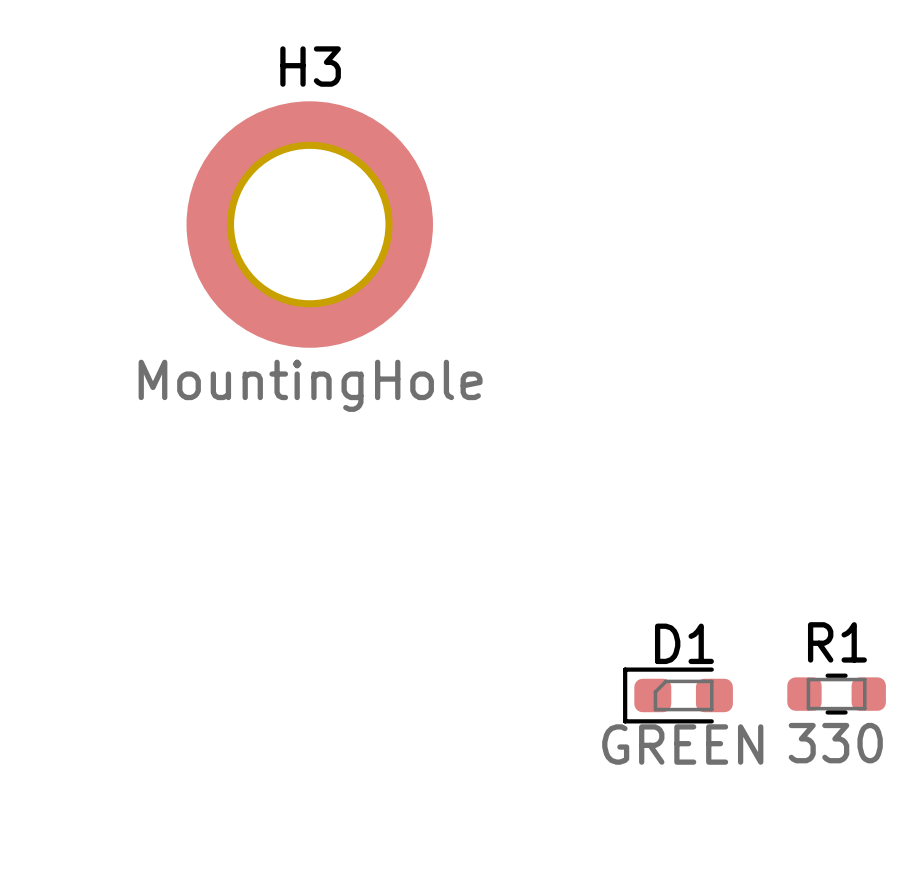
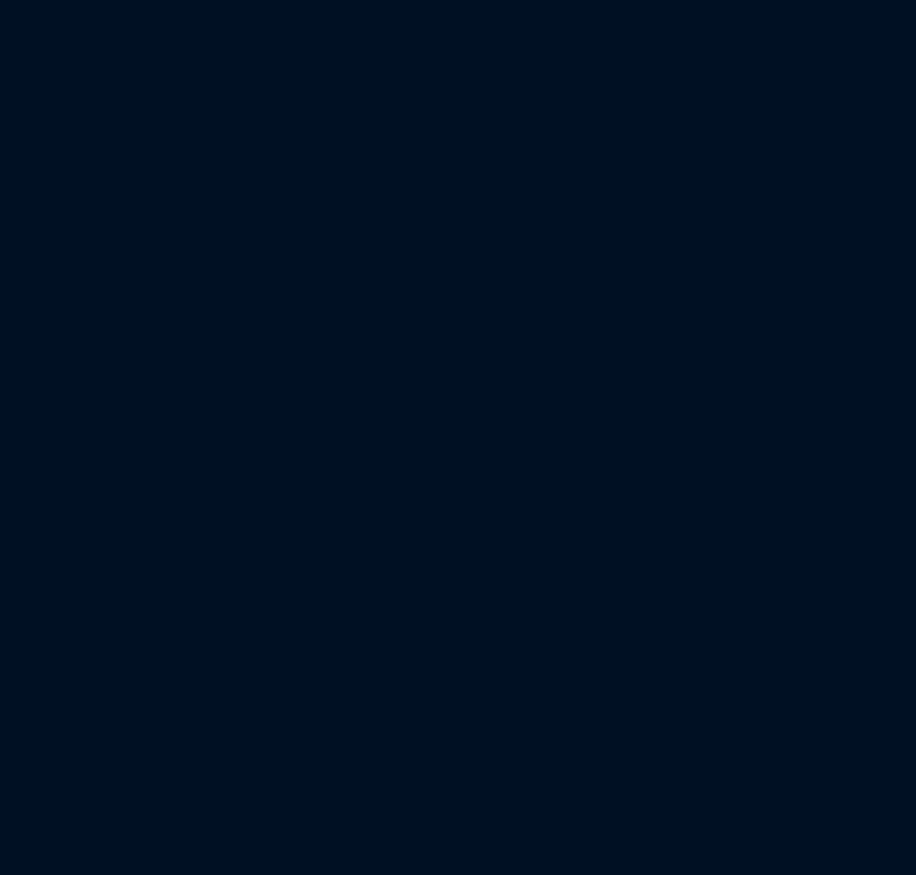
H3: MountingHole (309, 224) -> none
R1: 330 (836, 694) -> none
D1: GREEN (677, 695) -> none

